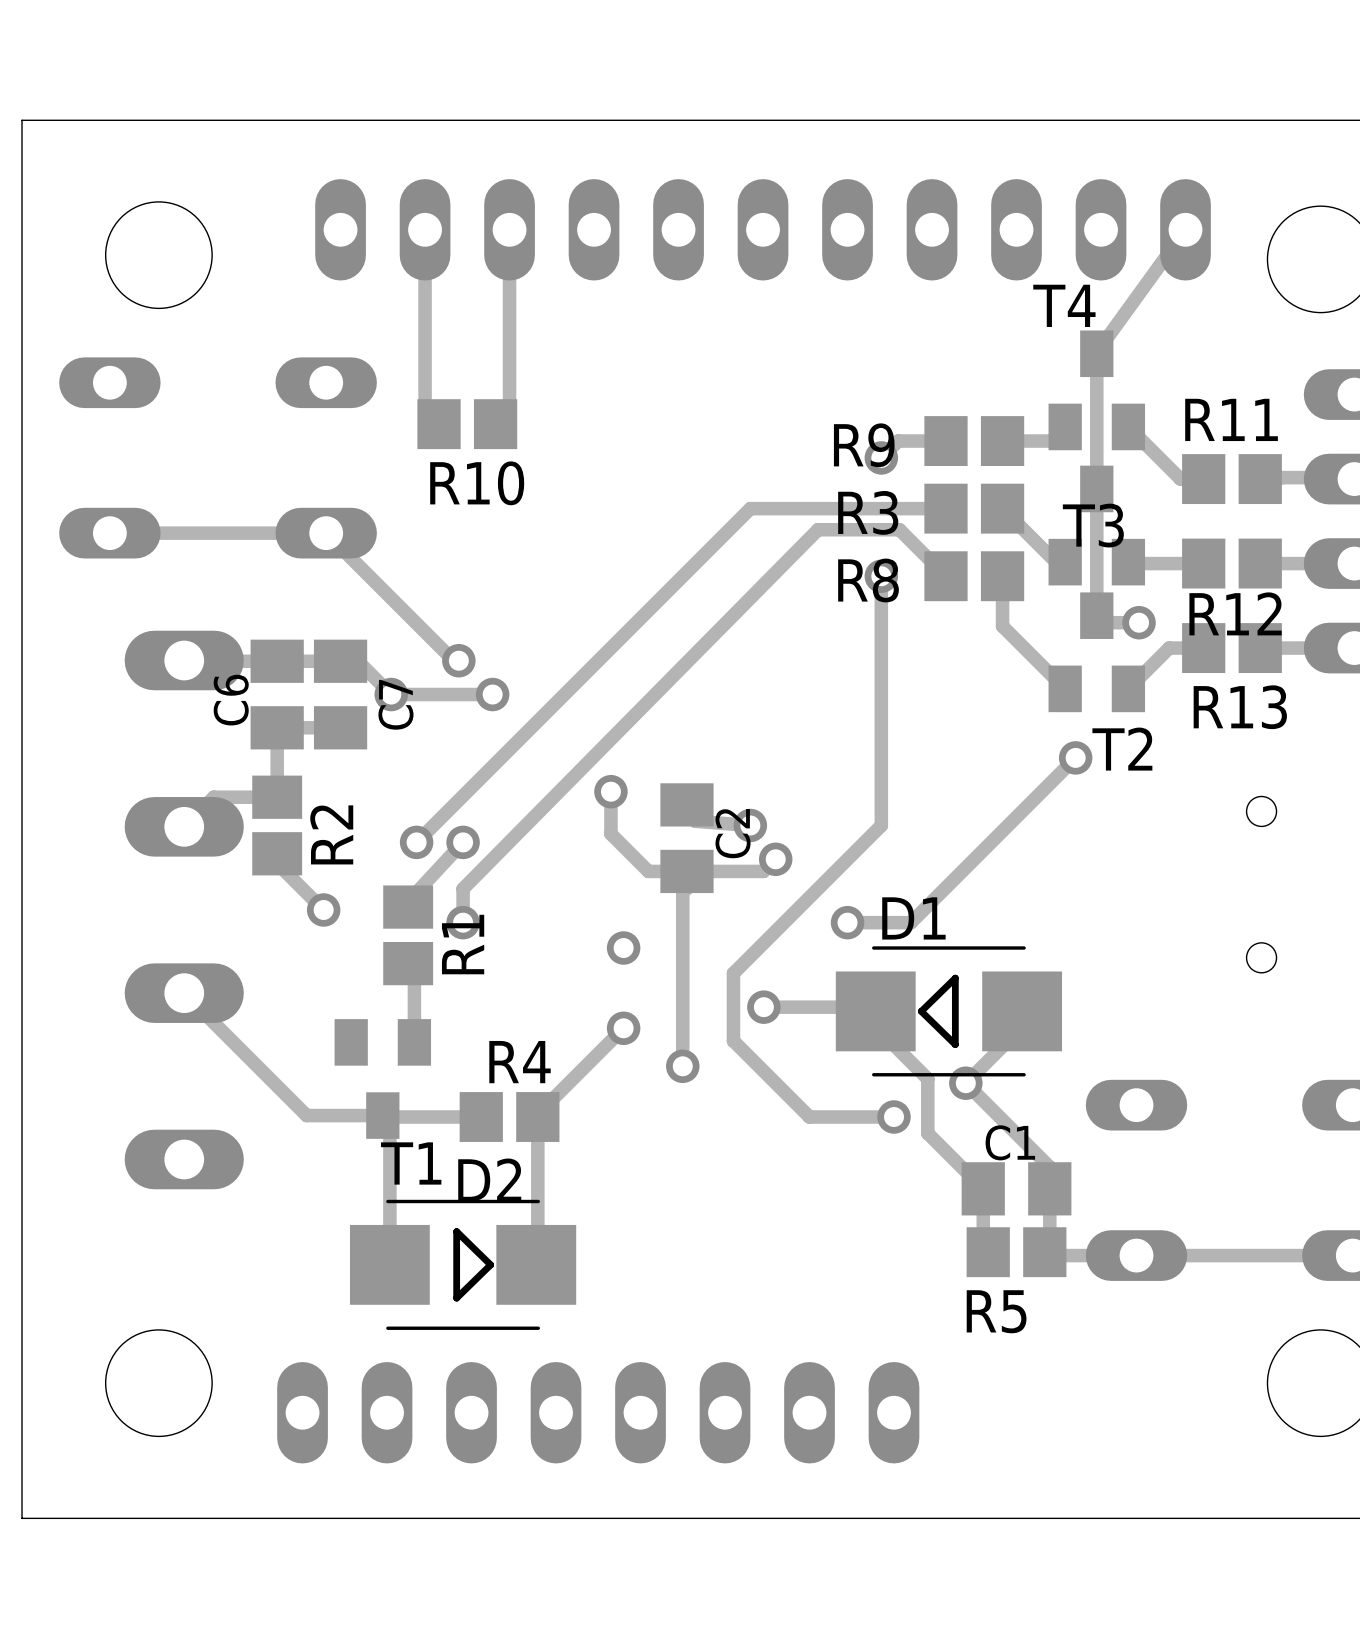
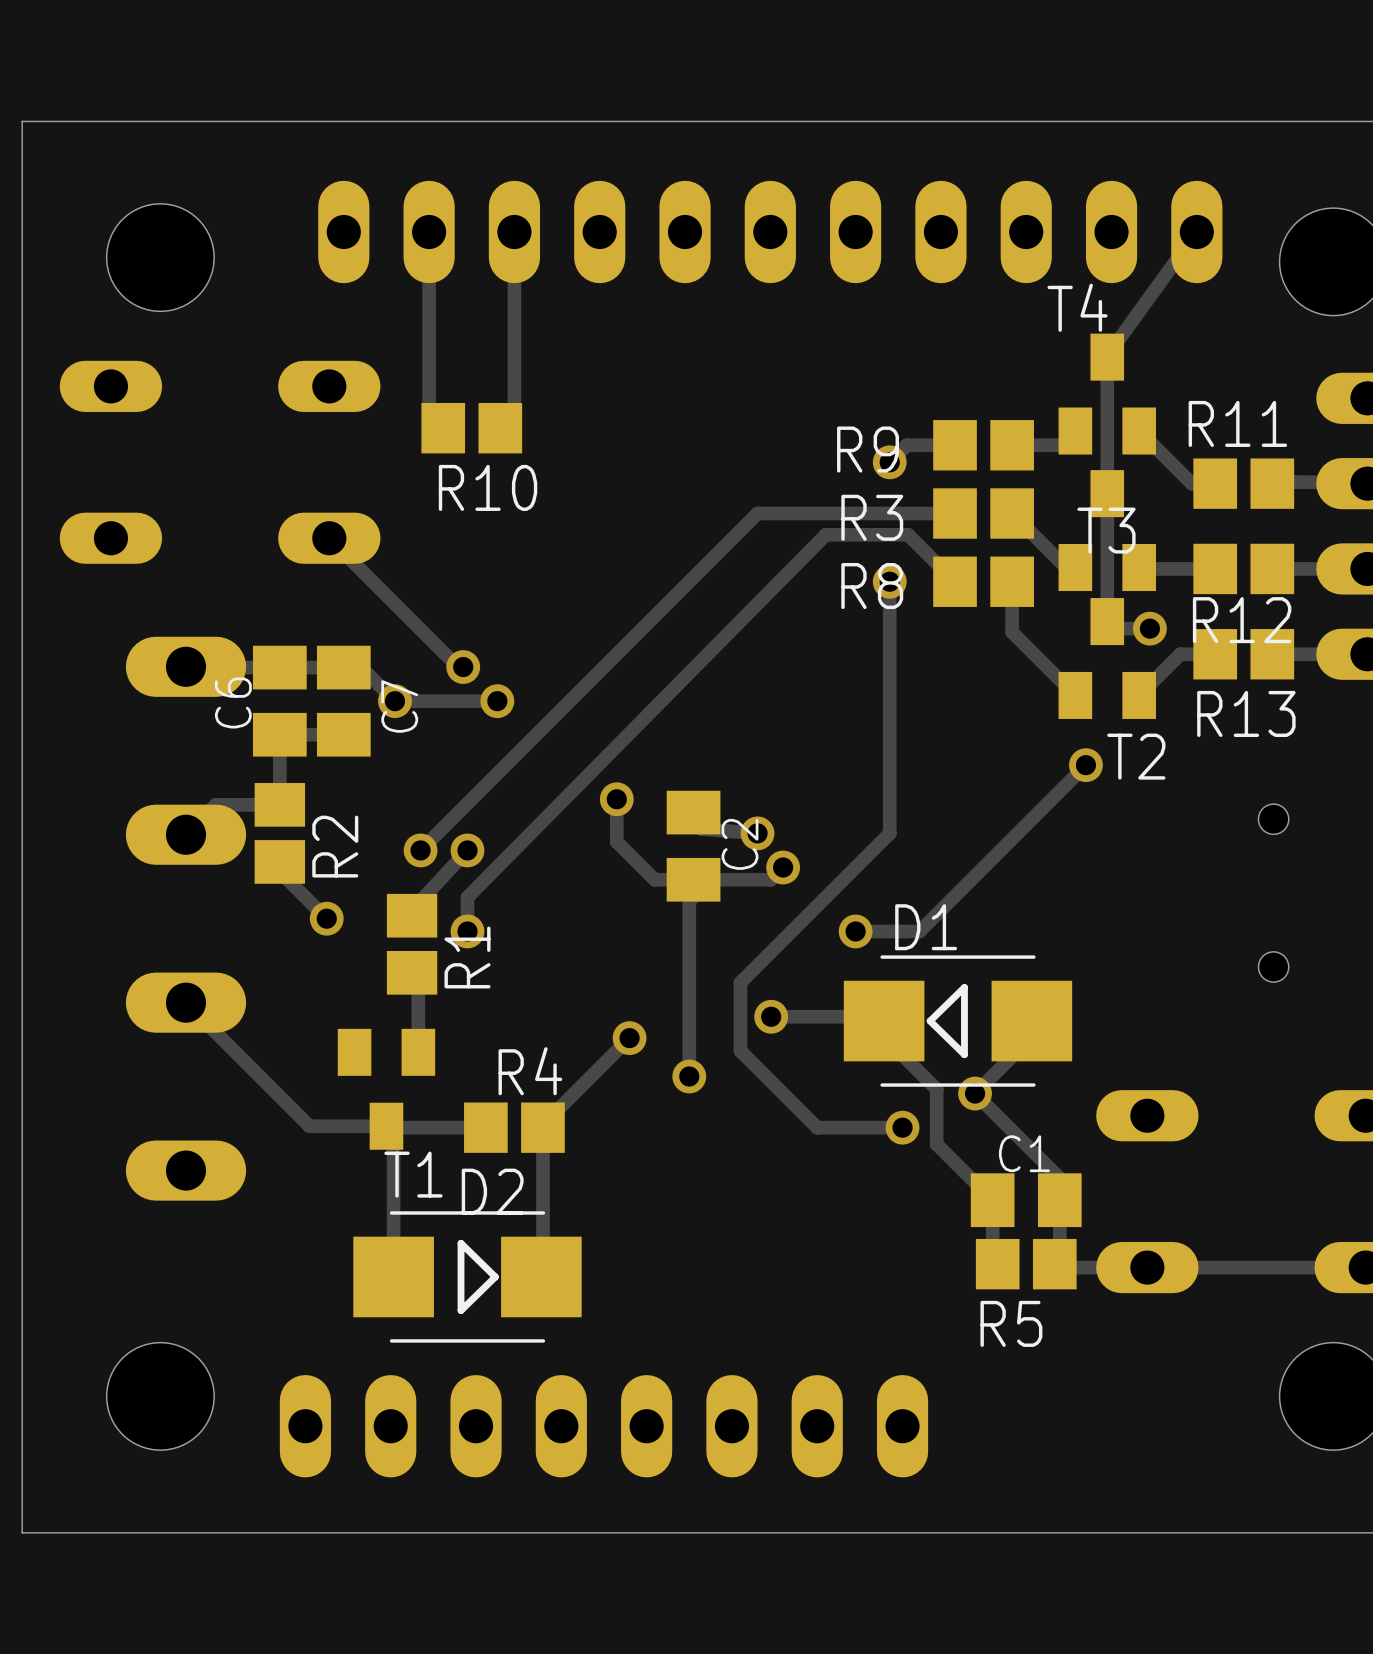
track: (326, 533) (109, 533) -> none
via: (623, 948) -> none

